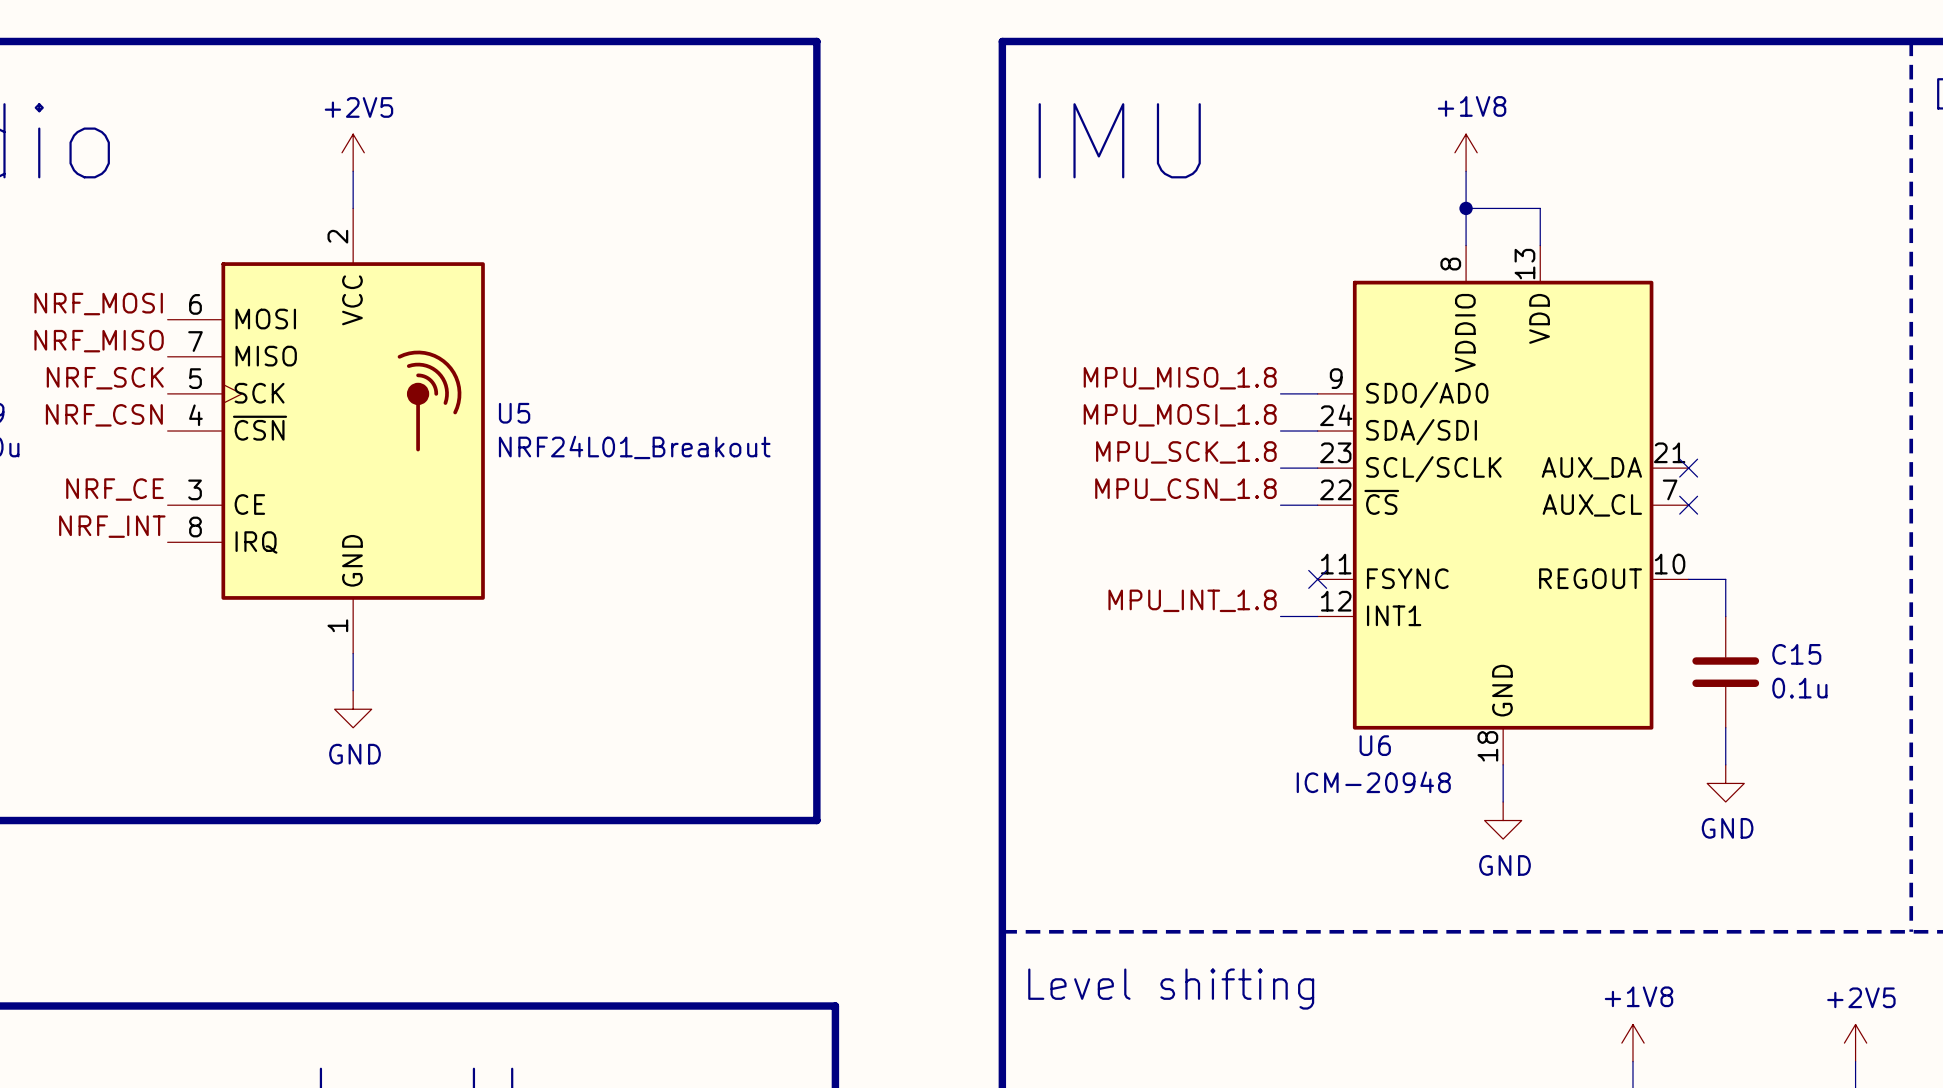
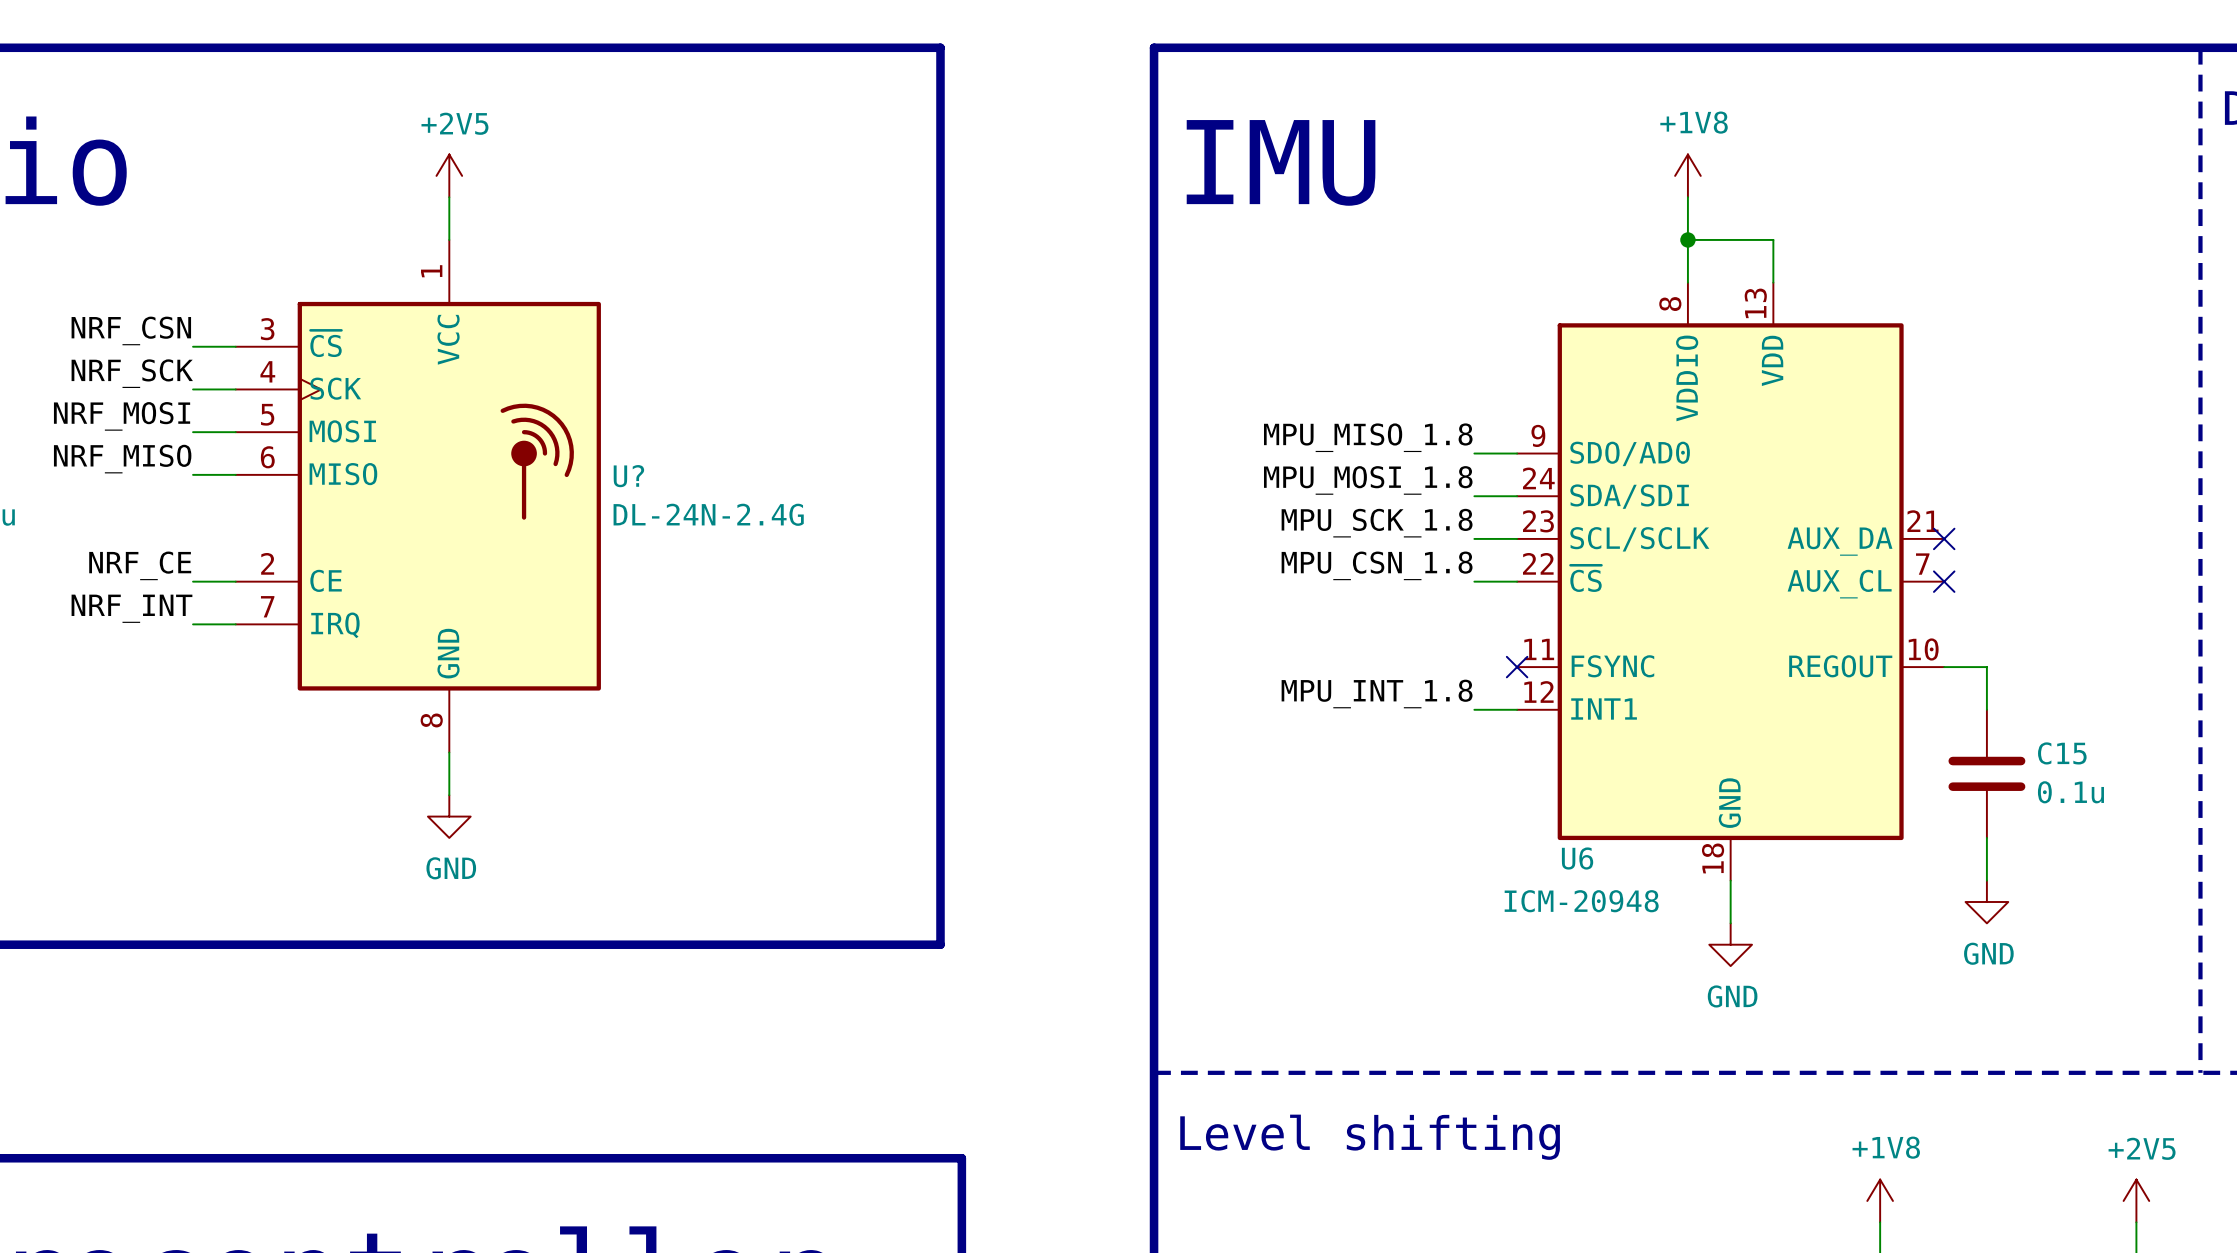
power symbol position: +2V5 (353, 152) -> +2V5 (449, 175)
wire: (353, 171) (353, 208) -> (449, 197) (449, 239)
wire: none -> (193, 346) (235, 346)
label position: NRF_MOSI (98, 304) -> NRF_MOSI (122, 416)
wire: none -> (193, 389) (235, 389)
label position: NRF_MISO (99, 341) -> NRF_MISO (122, 459)
wire: none -> (193, 432) (235, 432)
label position: NRF_SCK (105, 378) -> NRF_SCK (132, 373)
wire: none -> (193, 474) (235, 474)
label position: NRF_CSN (104, 415) -> NRF_CSN (131, 330)
U5: NRF24L01_Breakout (326, 431) -> none
U?: none -> DL-24N-2.4G (418, 496)
wire: (353, 653) (353, 690) -> (449, 752) (449, 795)
power symbol position: GND (353, 709) -> GND (449, 816)

